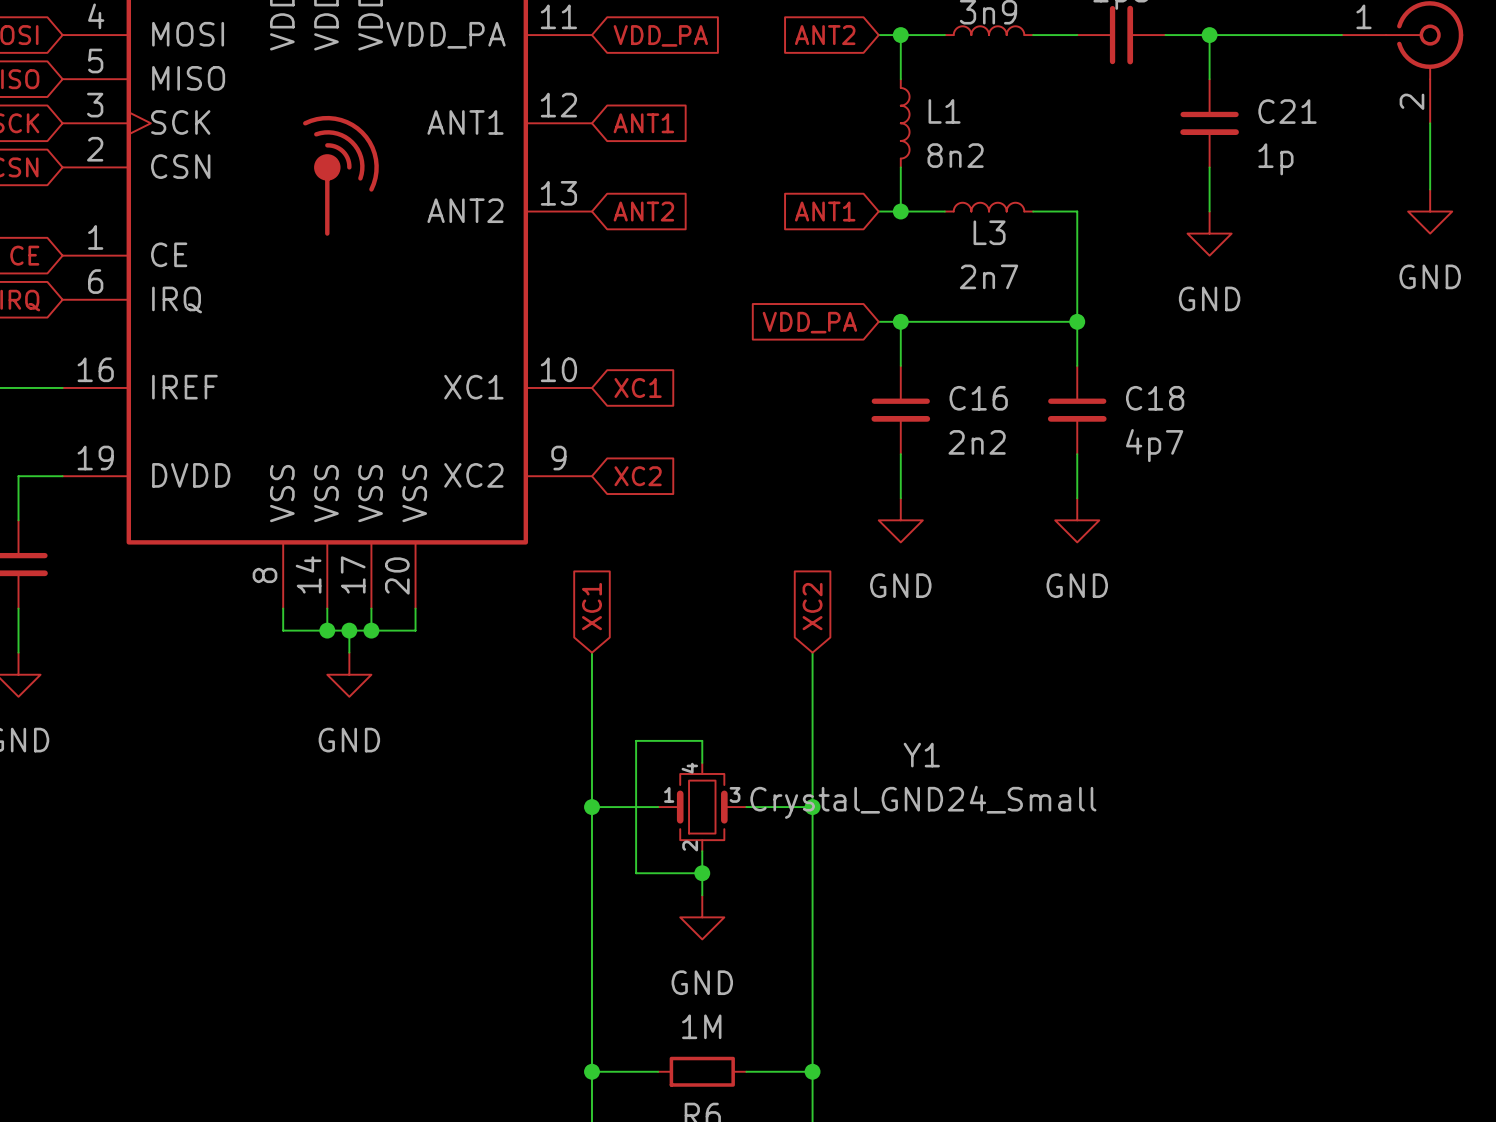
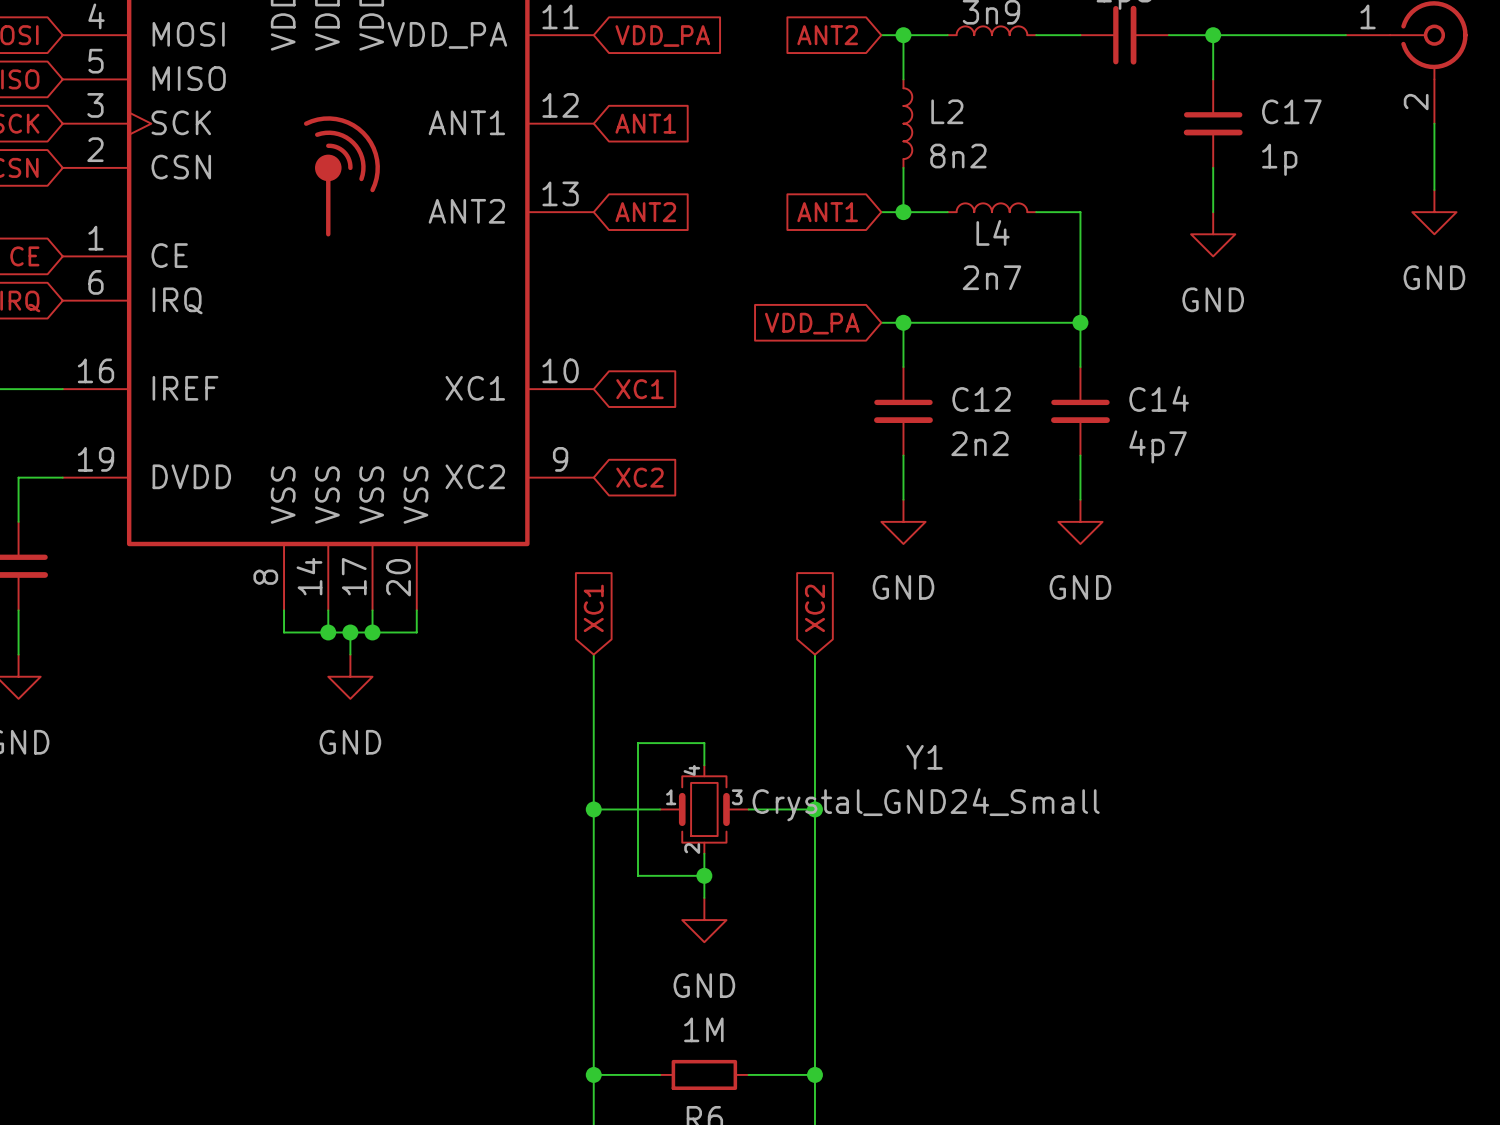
L1 name: L1 (944, 111) -> L2 (947, 111)
C21 name: C21 (1287, 111) -> C17 (1291, 111)
L3 name: L3 (989, 232) -> L4 (993, 232)
C16 name: C16 (978, 398) -> C12 (981, 399)
C18 name: C18 (1155, 398) -> C14 (1159, 398)

